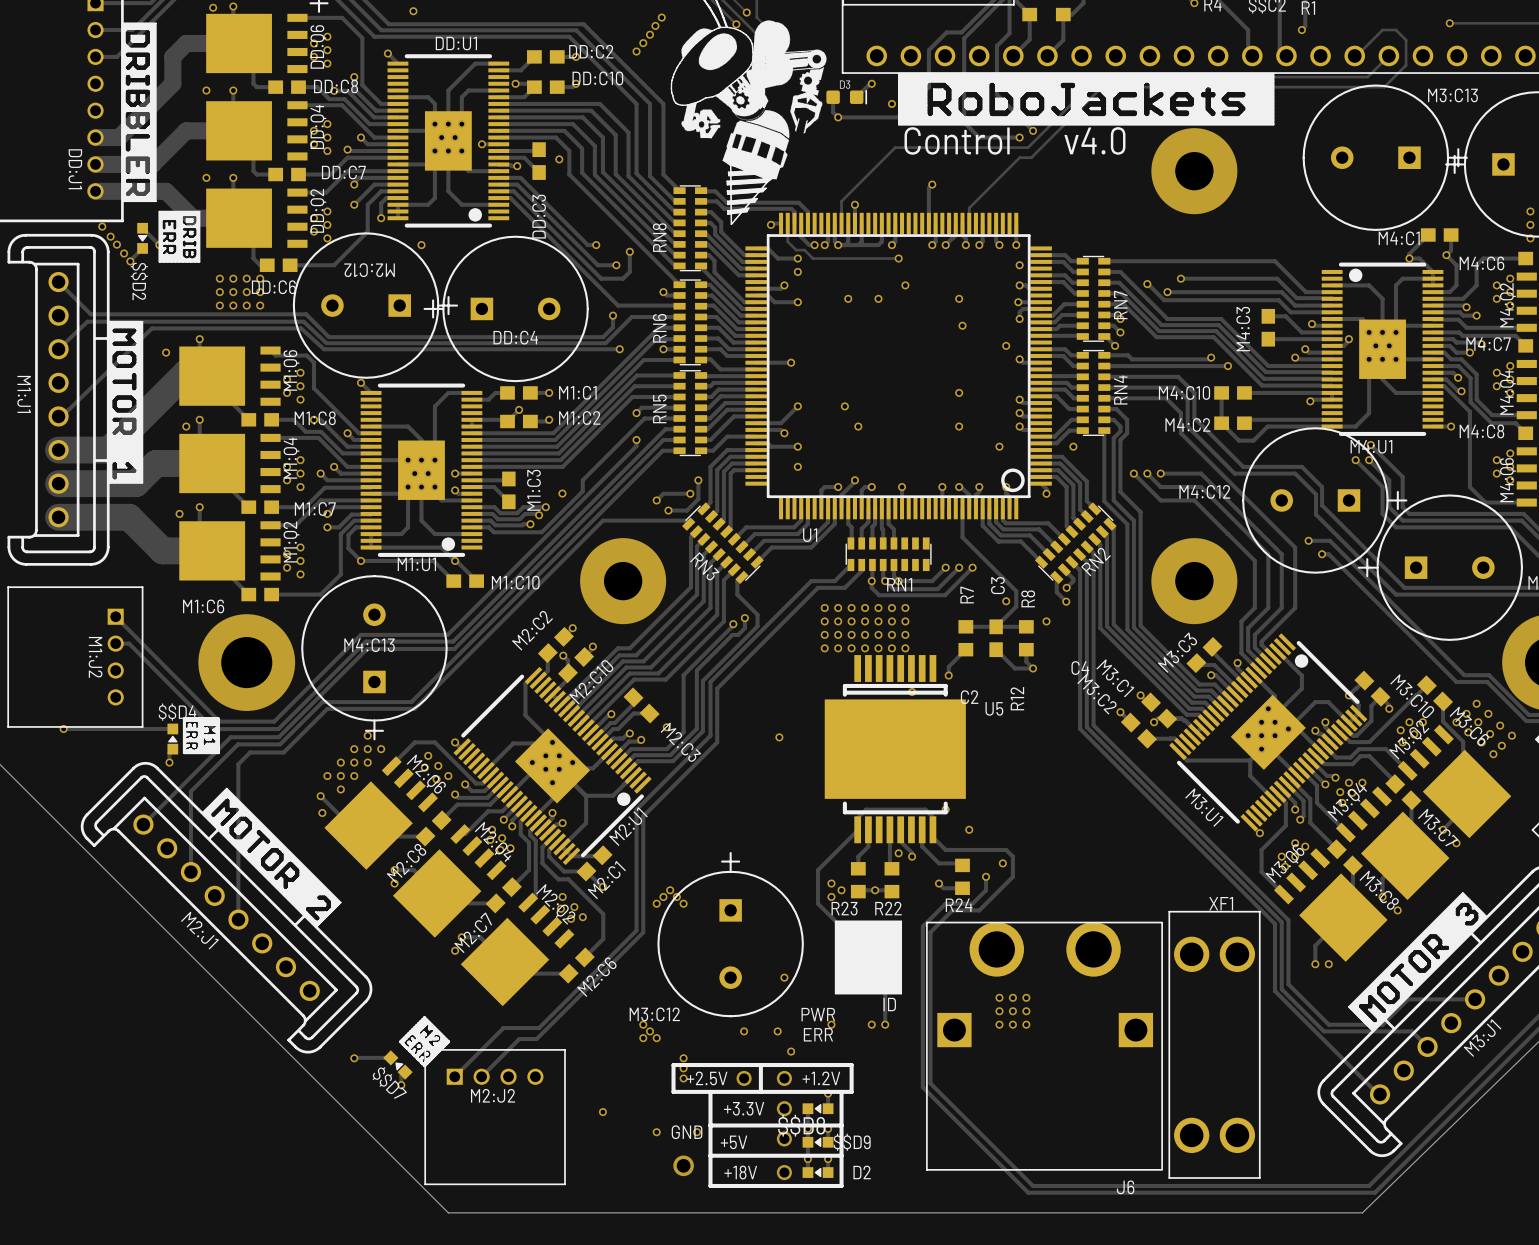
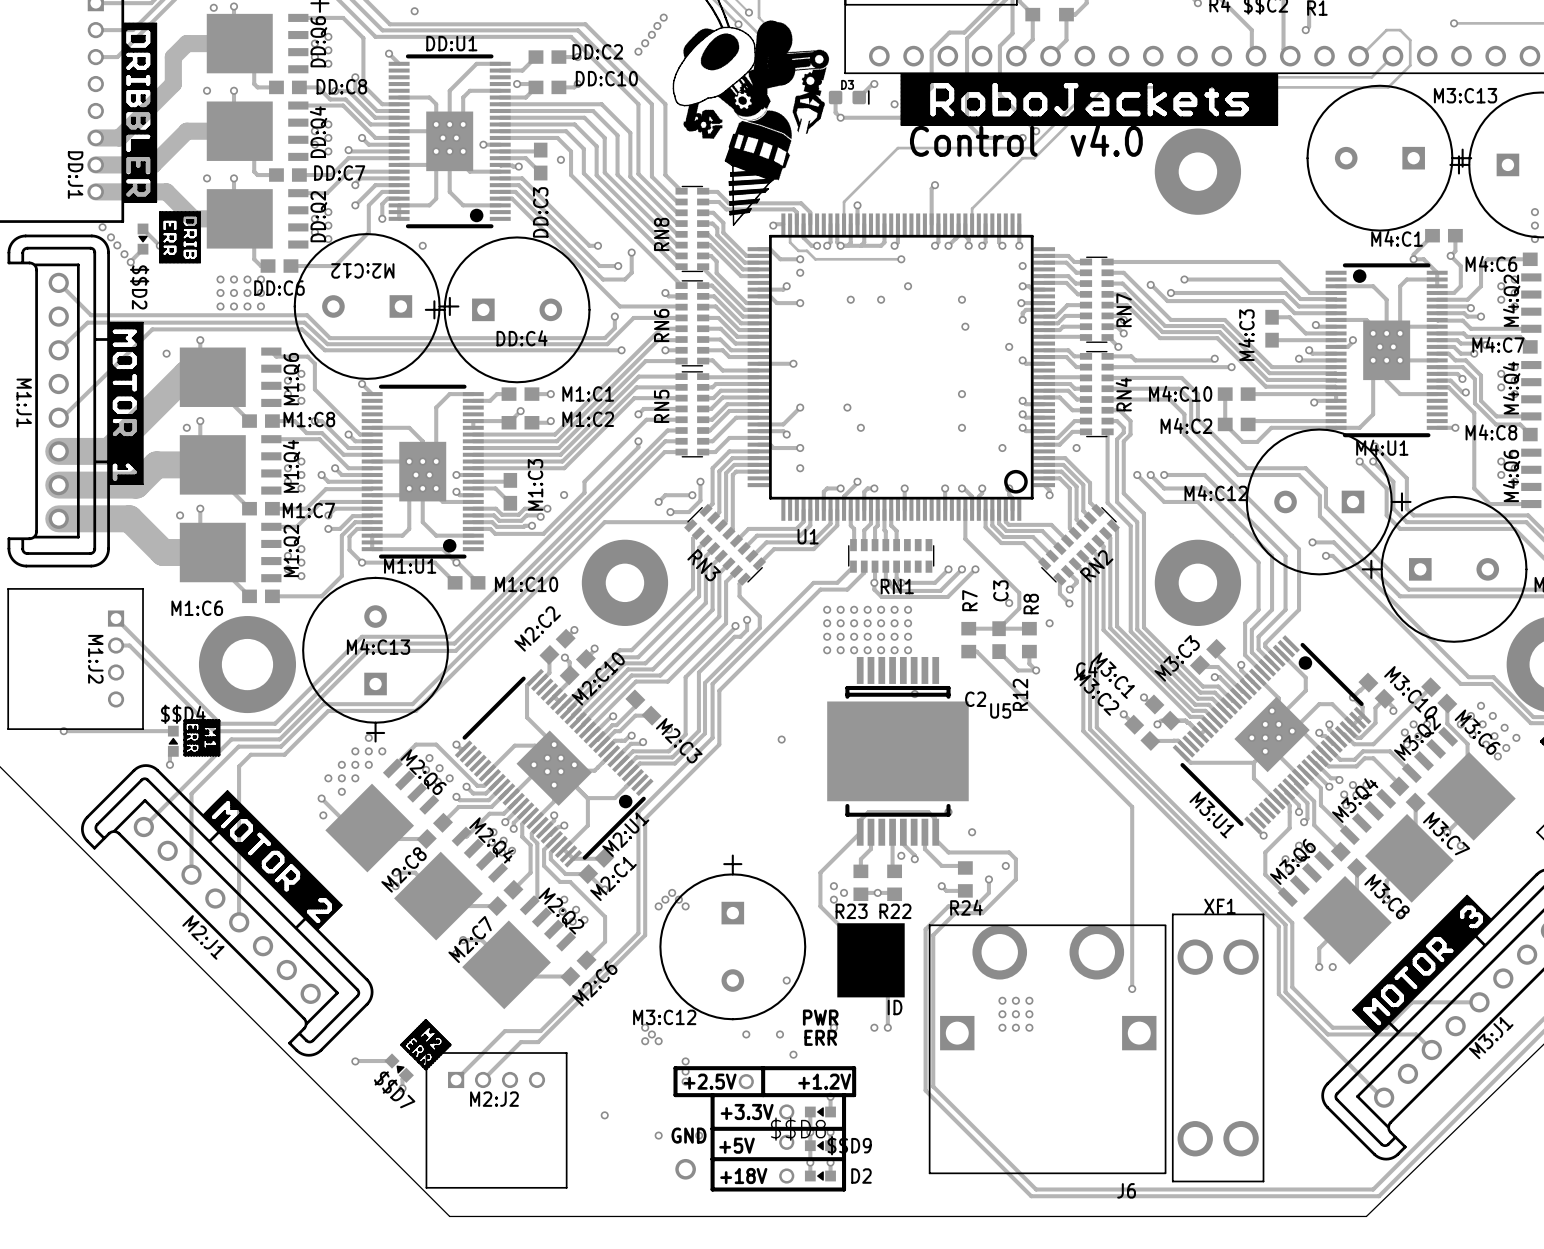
track: (965, 649) (948, 666) (948, 675) -> (968, 651) (976, 651) (1132, 806) (1132, 988)
via: (948, 675) -> none
via: none -> (1132, 988)
via: (784, 1078) -> none

